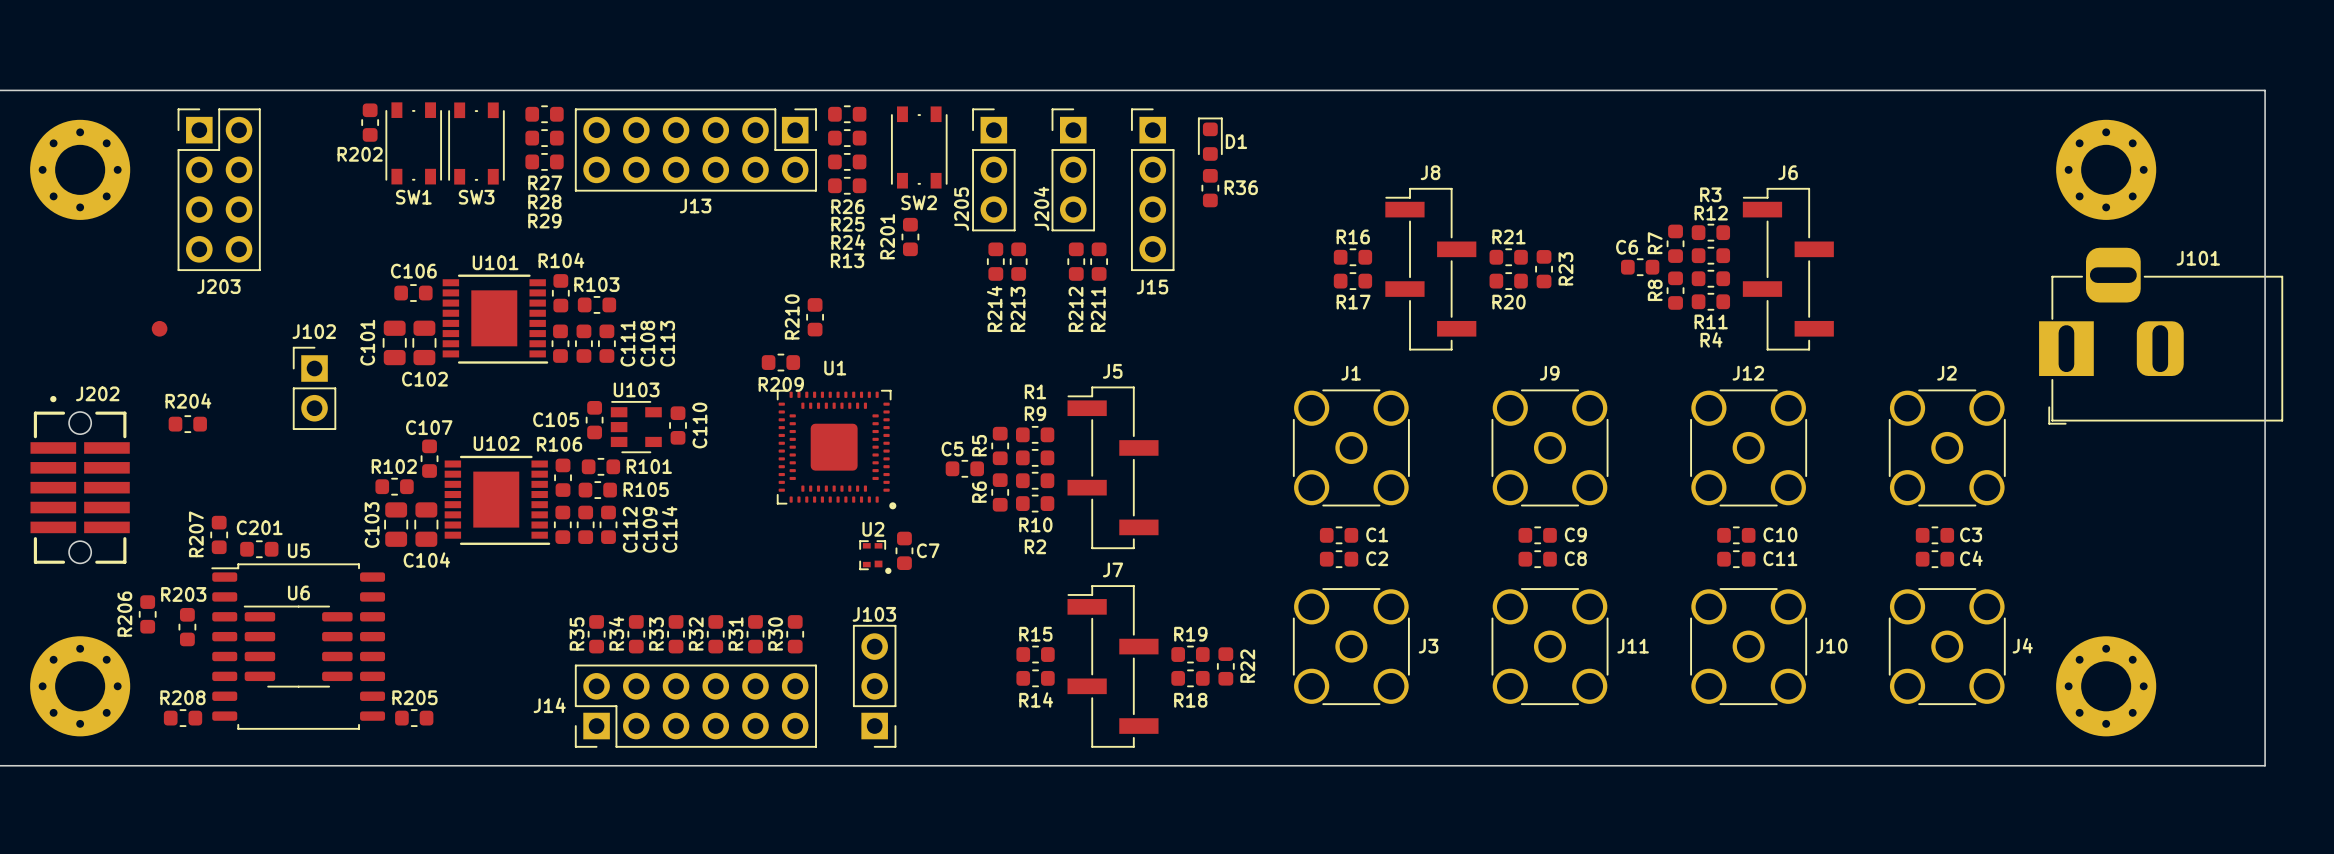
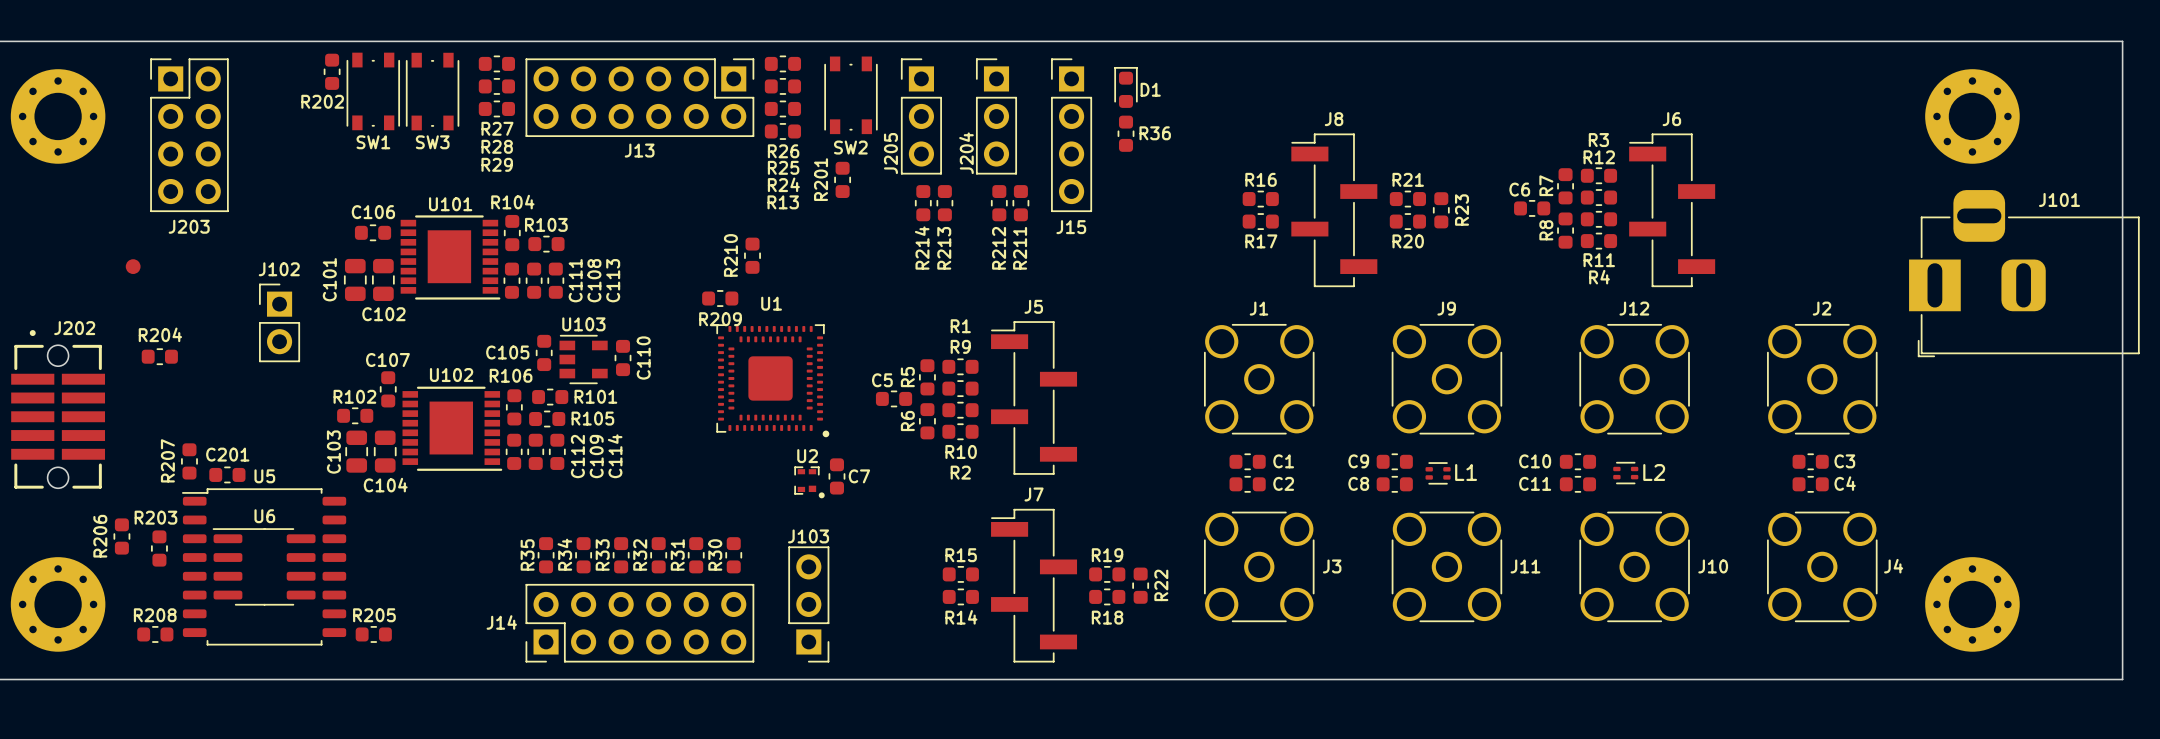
C9 name position: C9 (1575, 534) -> C9 (1358, 461)
C10 name position: C10 (1780, 534) -> C10 (1535, 461)
C9 position: (1537, 535) -> (1394, 461)
C10 position: (1736, 535) -> (1577, 461)
L1: none -> (1438, 473)
L2: none -> (1625, 473)
C8 name position: C8 (1575, 558) -> C8 (1358, 483)
C11 name position: C11 (1780, 558) -> C11 (1535, 483)
C8 position: (1537, 559) -> (1394, 484)
C11 position: (1736, 559) -> (1577, 484)

